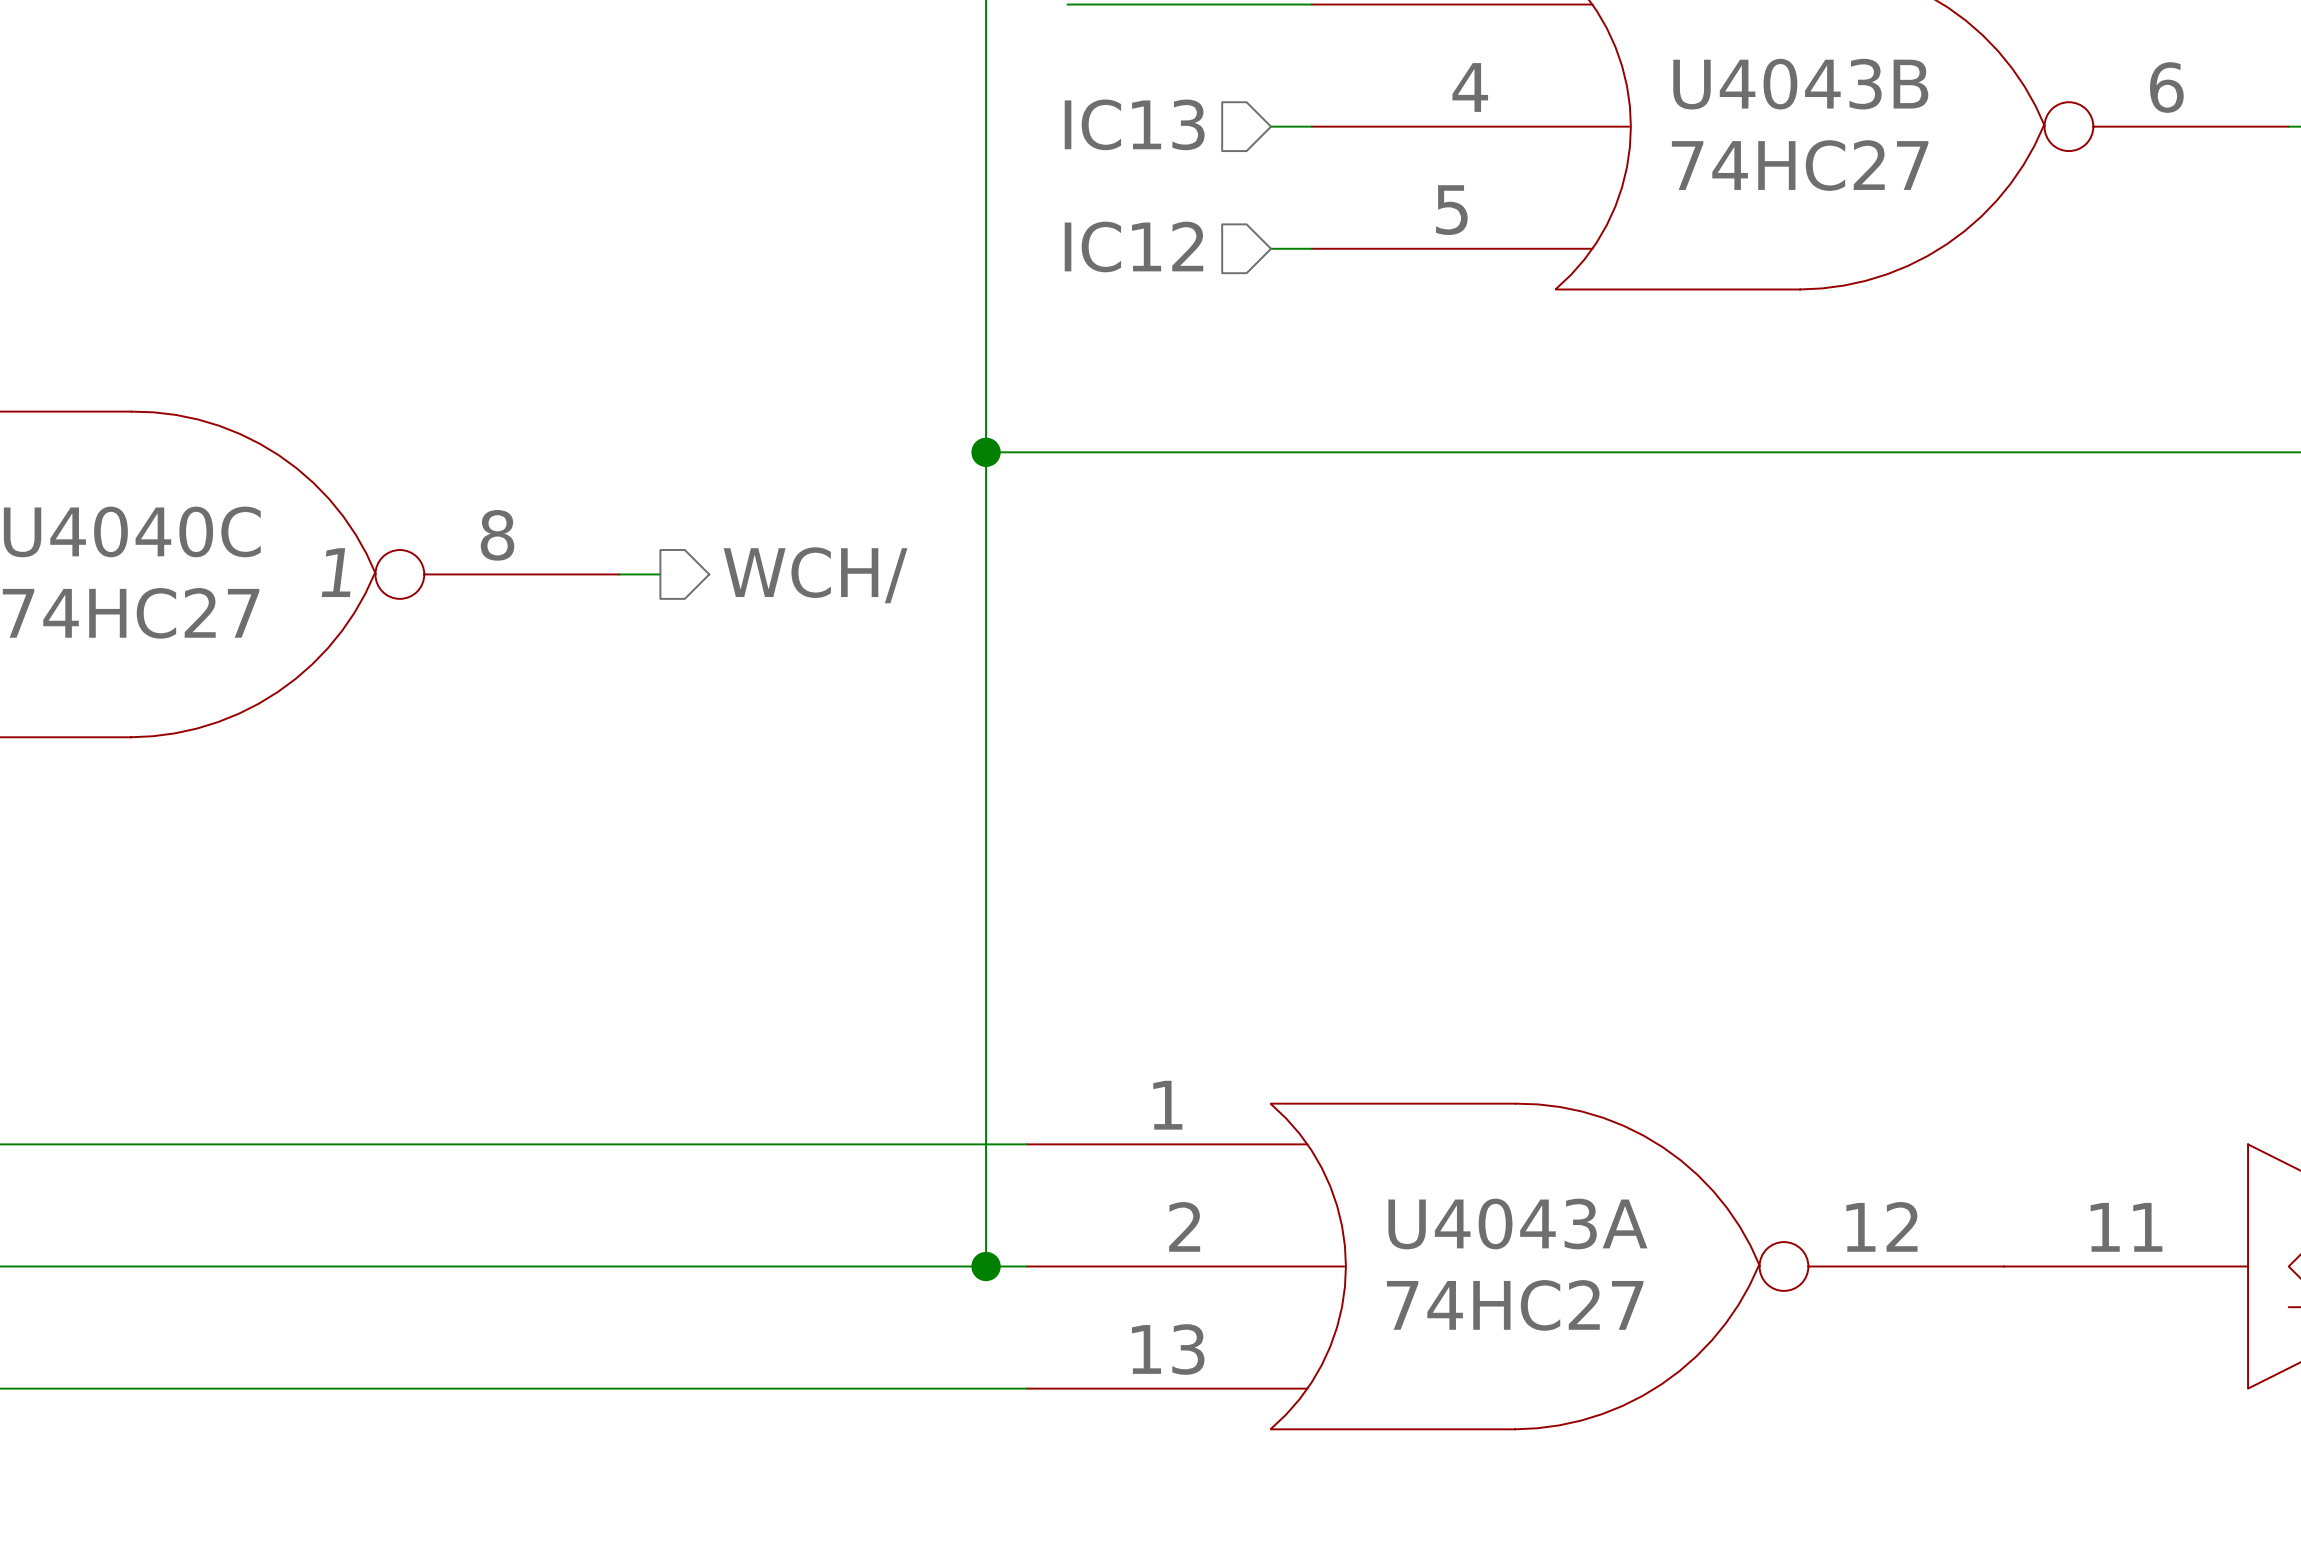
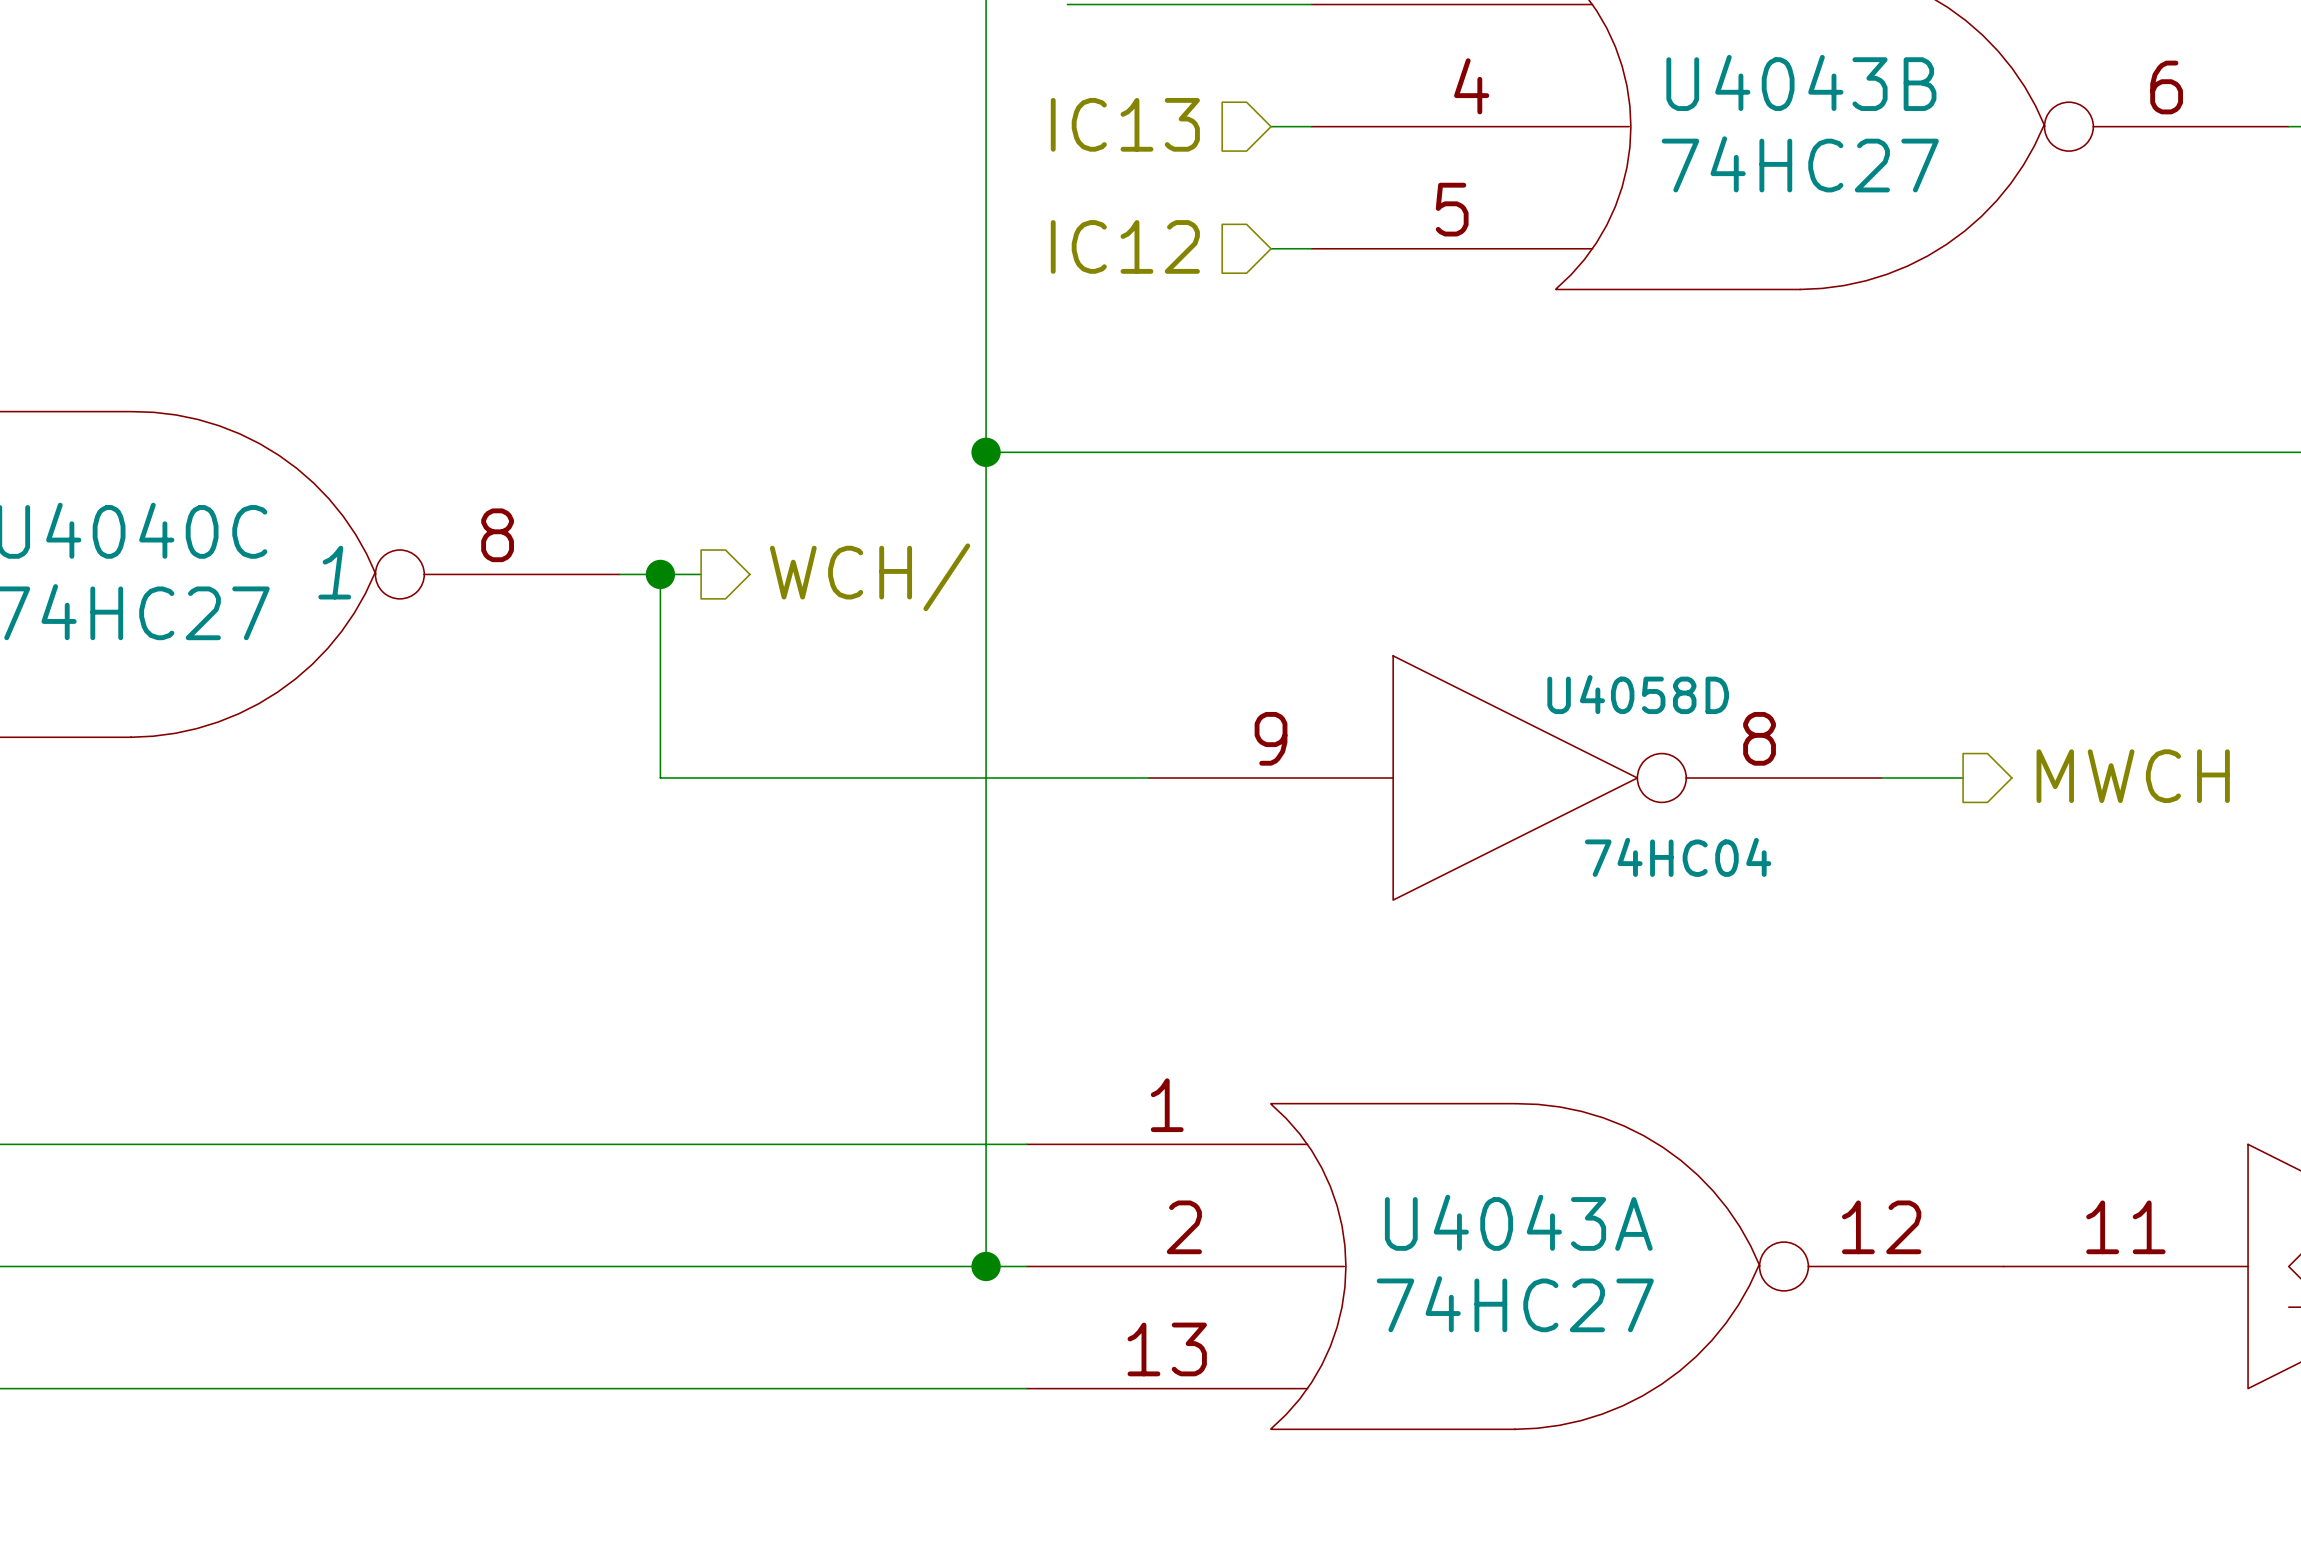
junction: none -> (660, 574)
wire: none -> (701, 574) (660, 574) (660, 777) (1148, 777)
hierarchical label position: WCH/ (815, 575) -> WCH/ (870, 577)
hierarchical label: none -> MWCH (2133, 776)
U4058D: none -> 74HC04 (1515, 777)
wire: none -> (1881, 777) (1963, 777)

